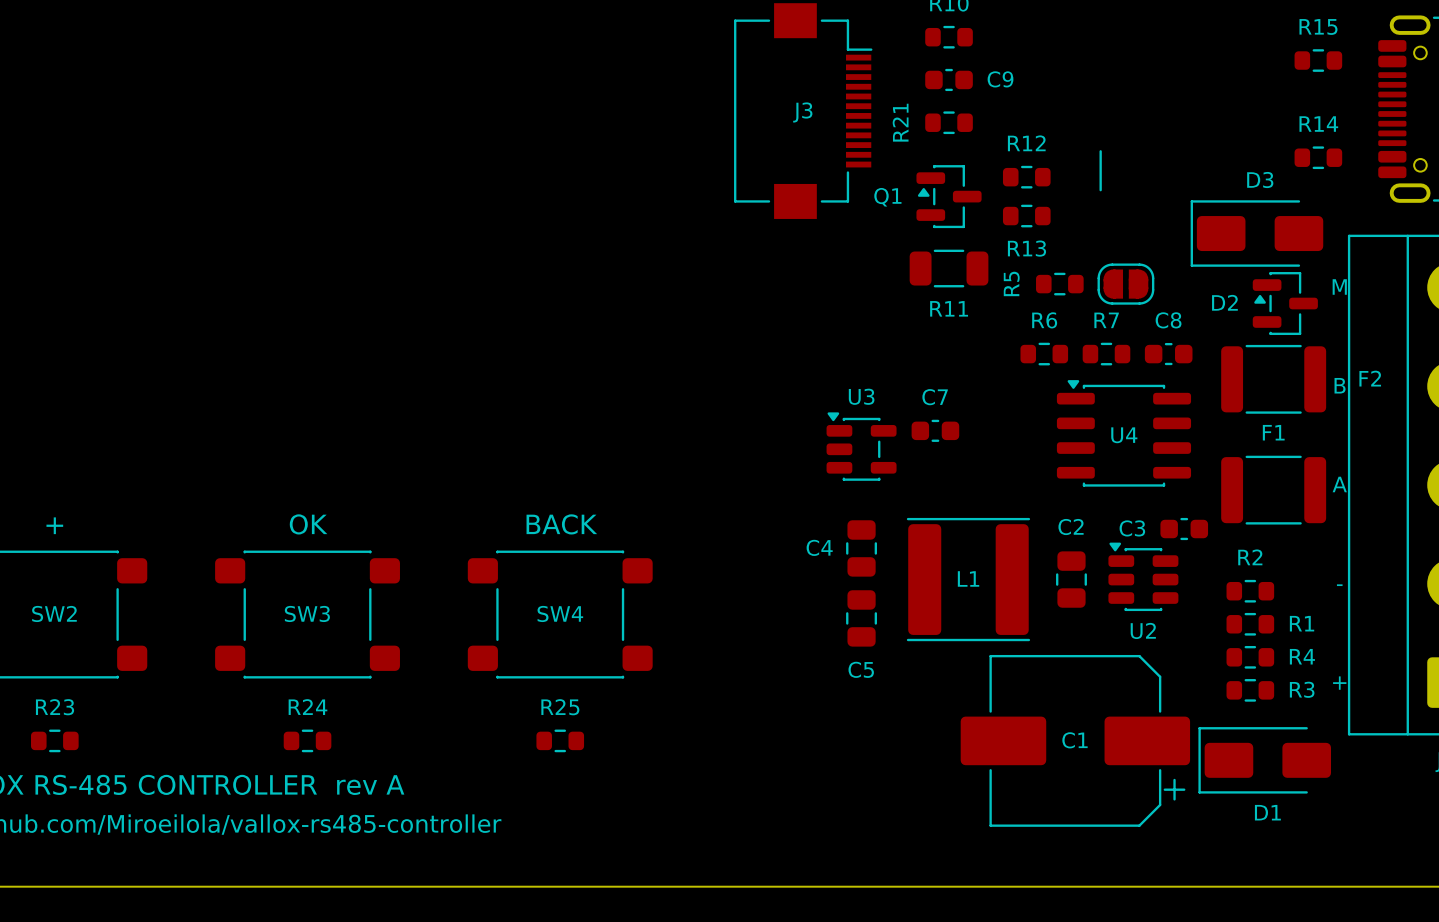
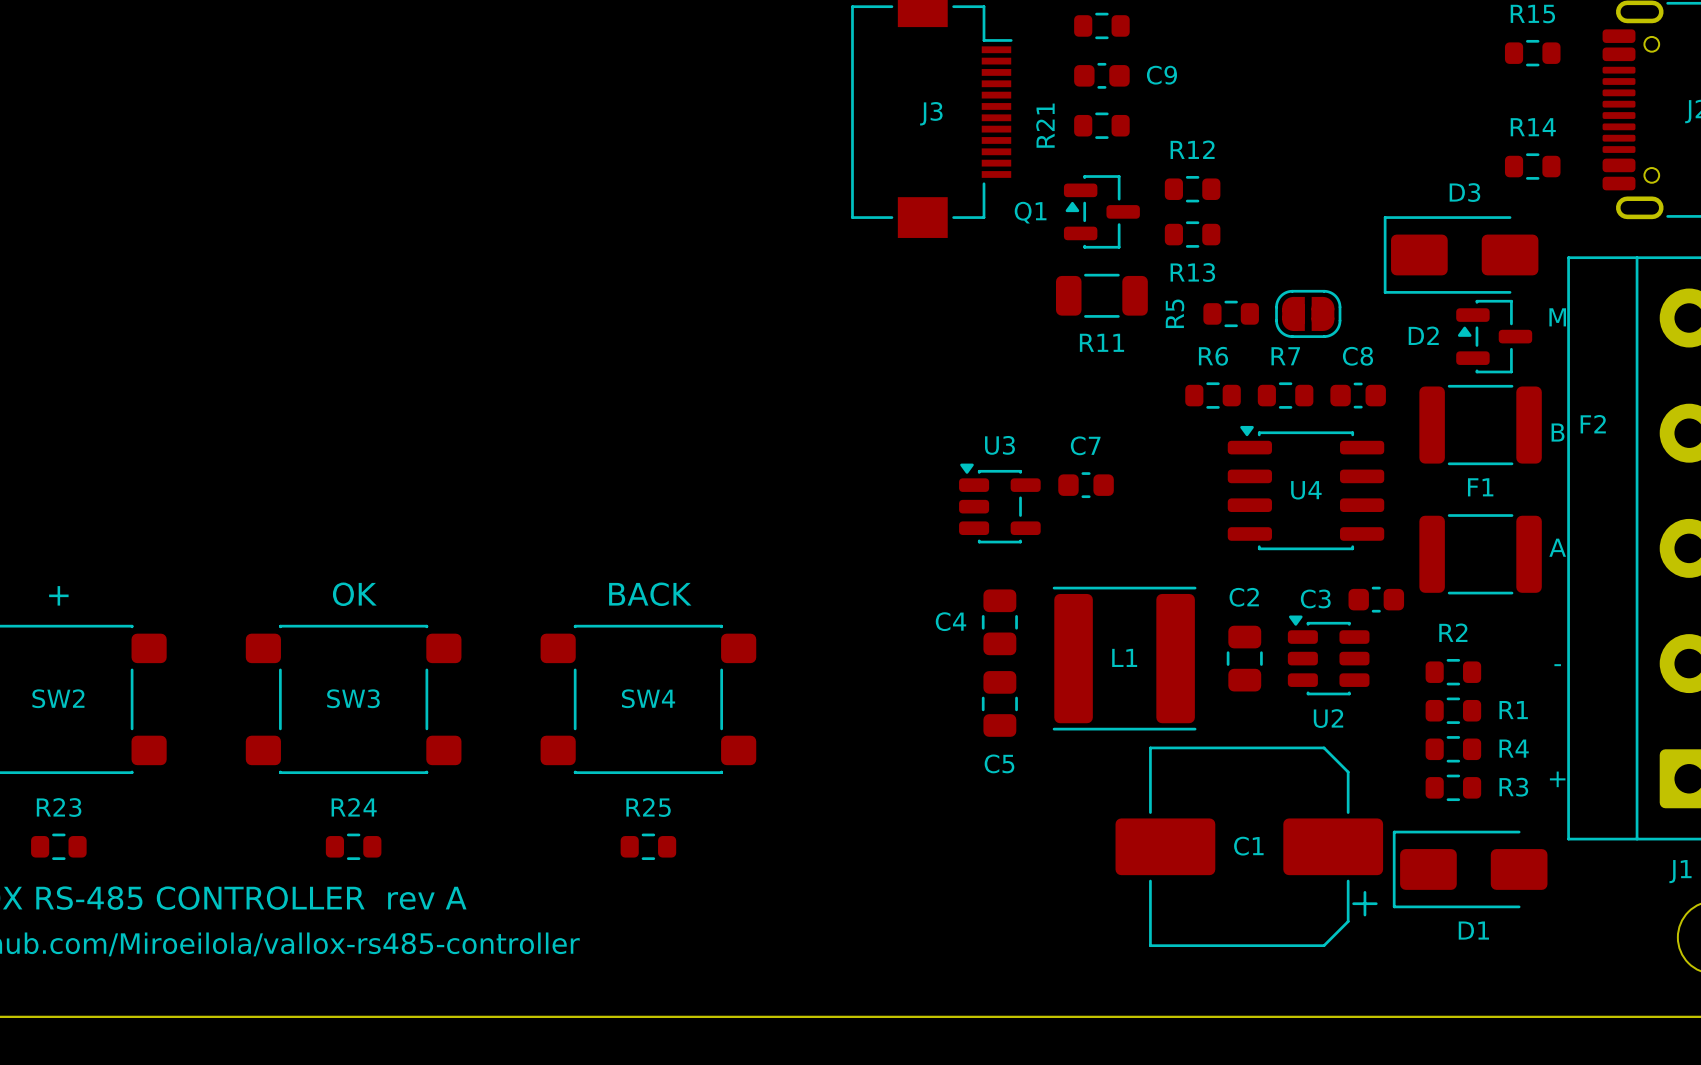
drawing: [1099, 150, 1102, 192] -> none

